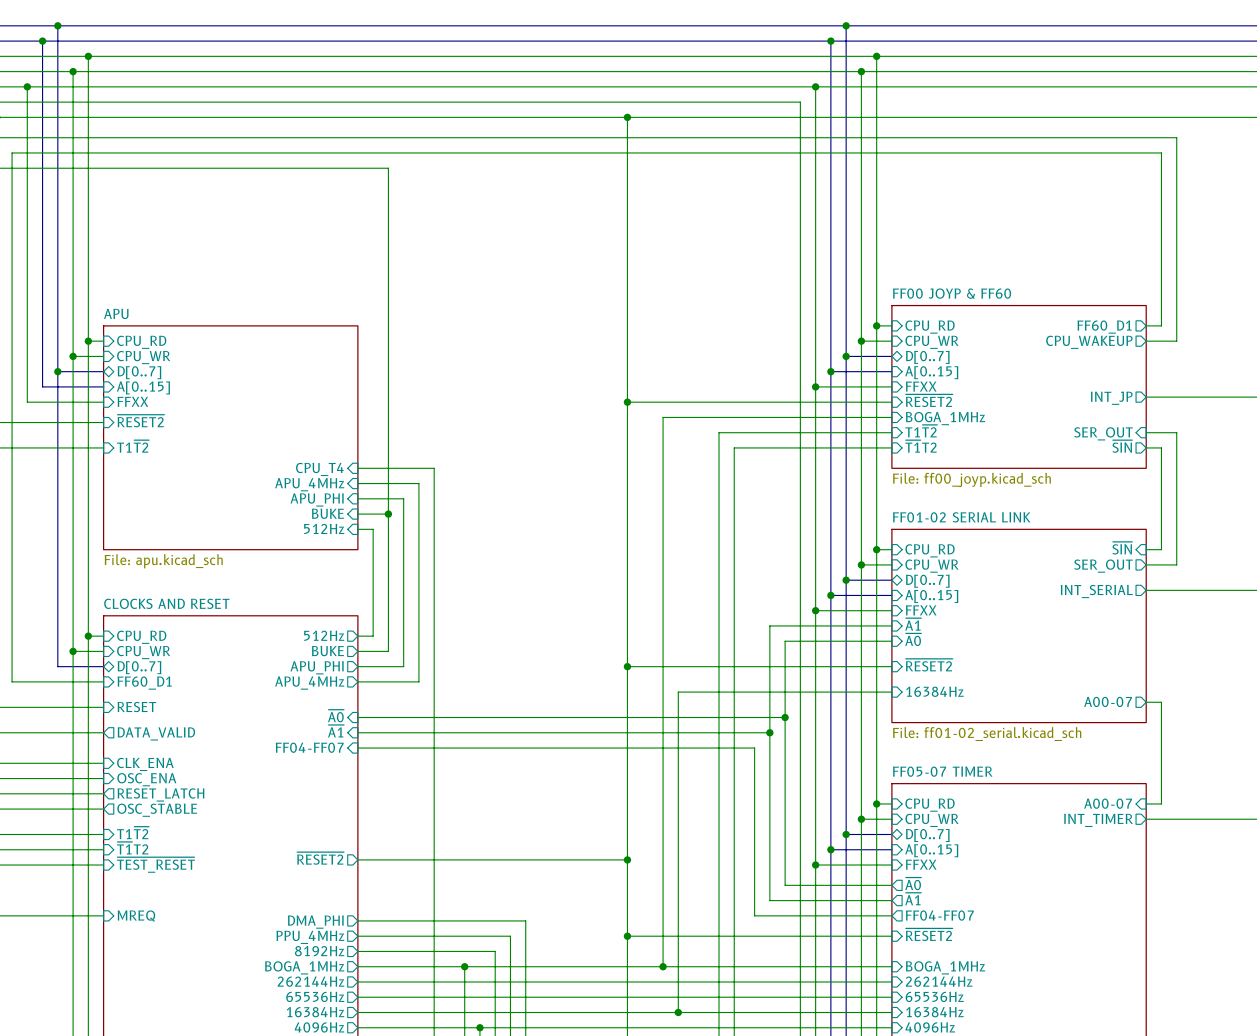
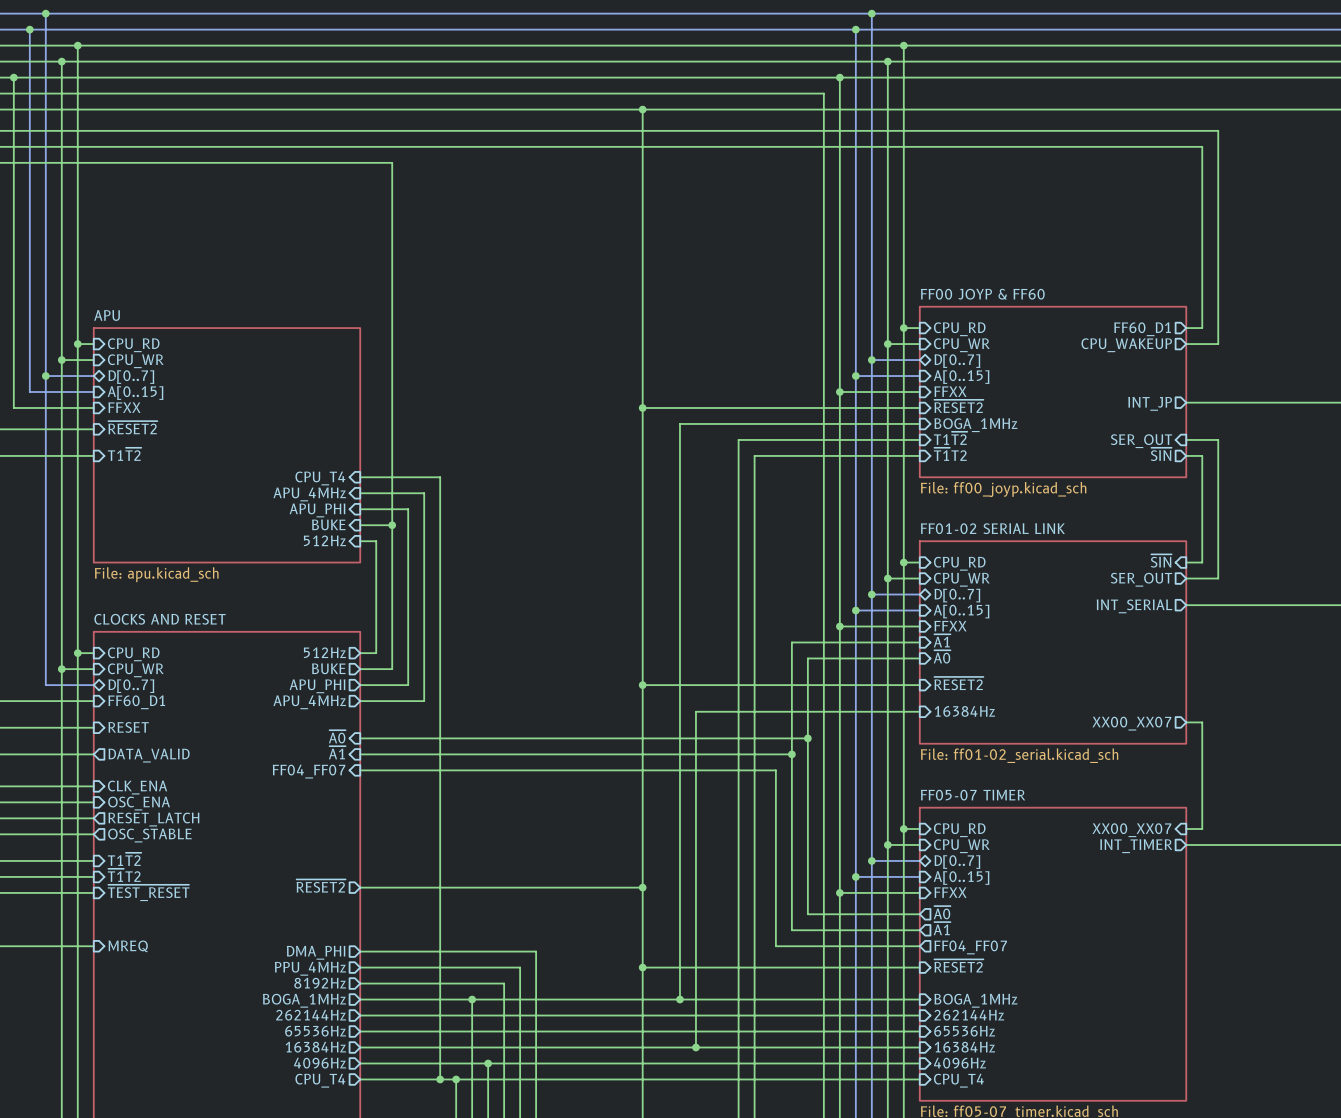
sheet pin: A00-07 (1108, 701) -> XX00_XX07 (1131, 723)
sheet pin: FF04-FF07 (309, 747) -> FF04_FF07 (309, 771)
sheet pin: A00-07 (1108, 803) -> XX00_XX07 (1131, 830)
sheet pin: FF04-FF07 (939, 915) -> FF04_FF07 (970, 947)

